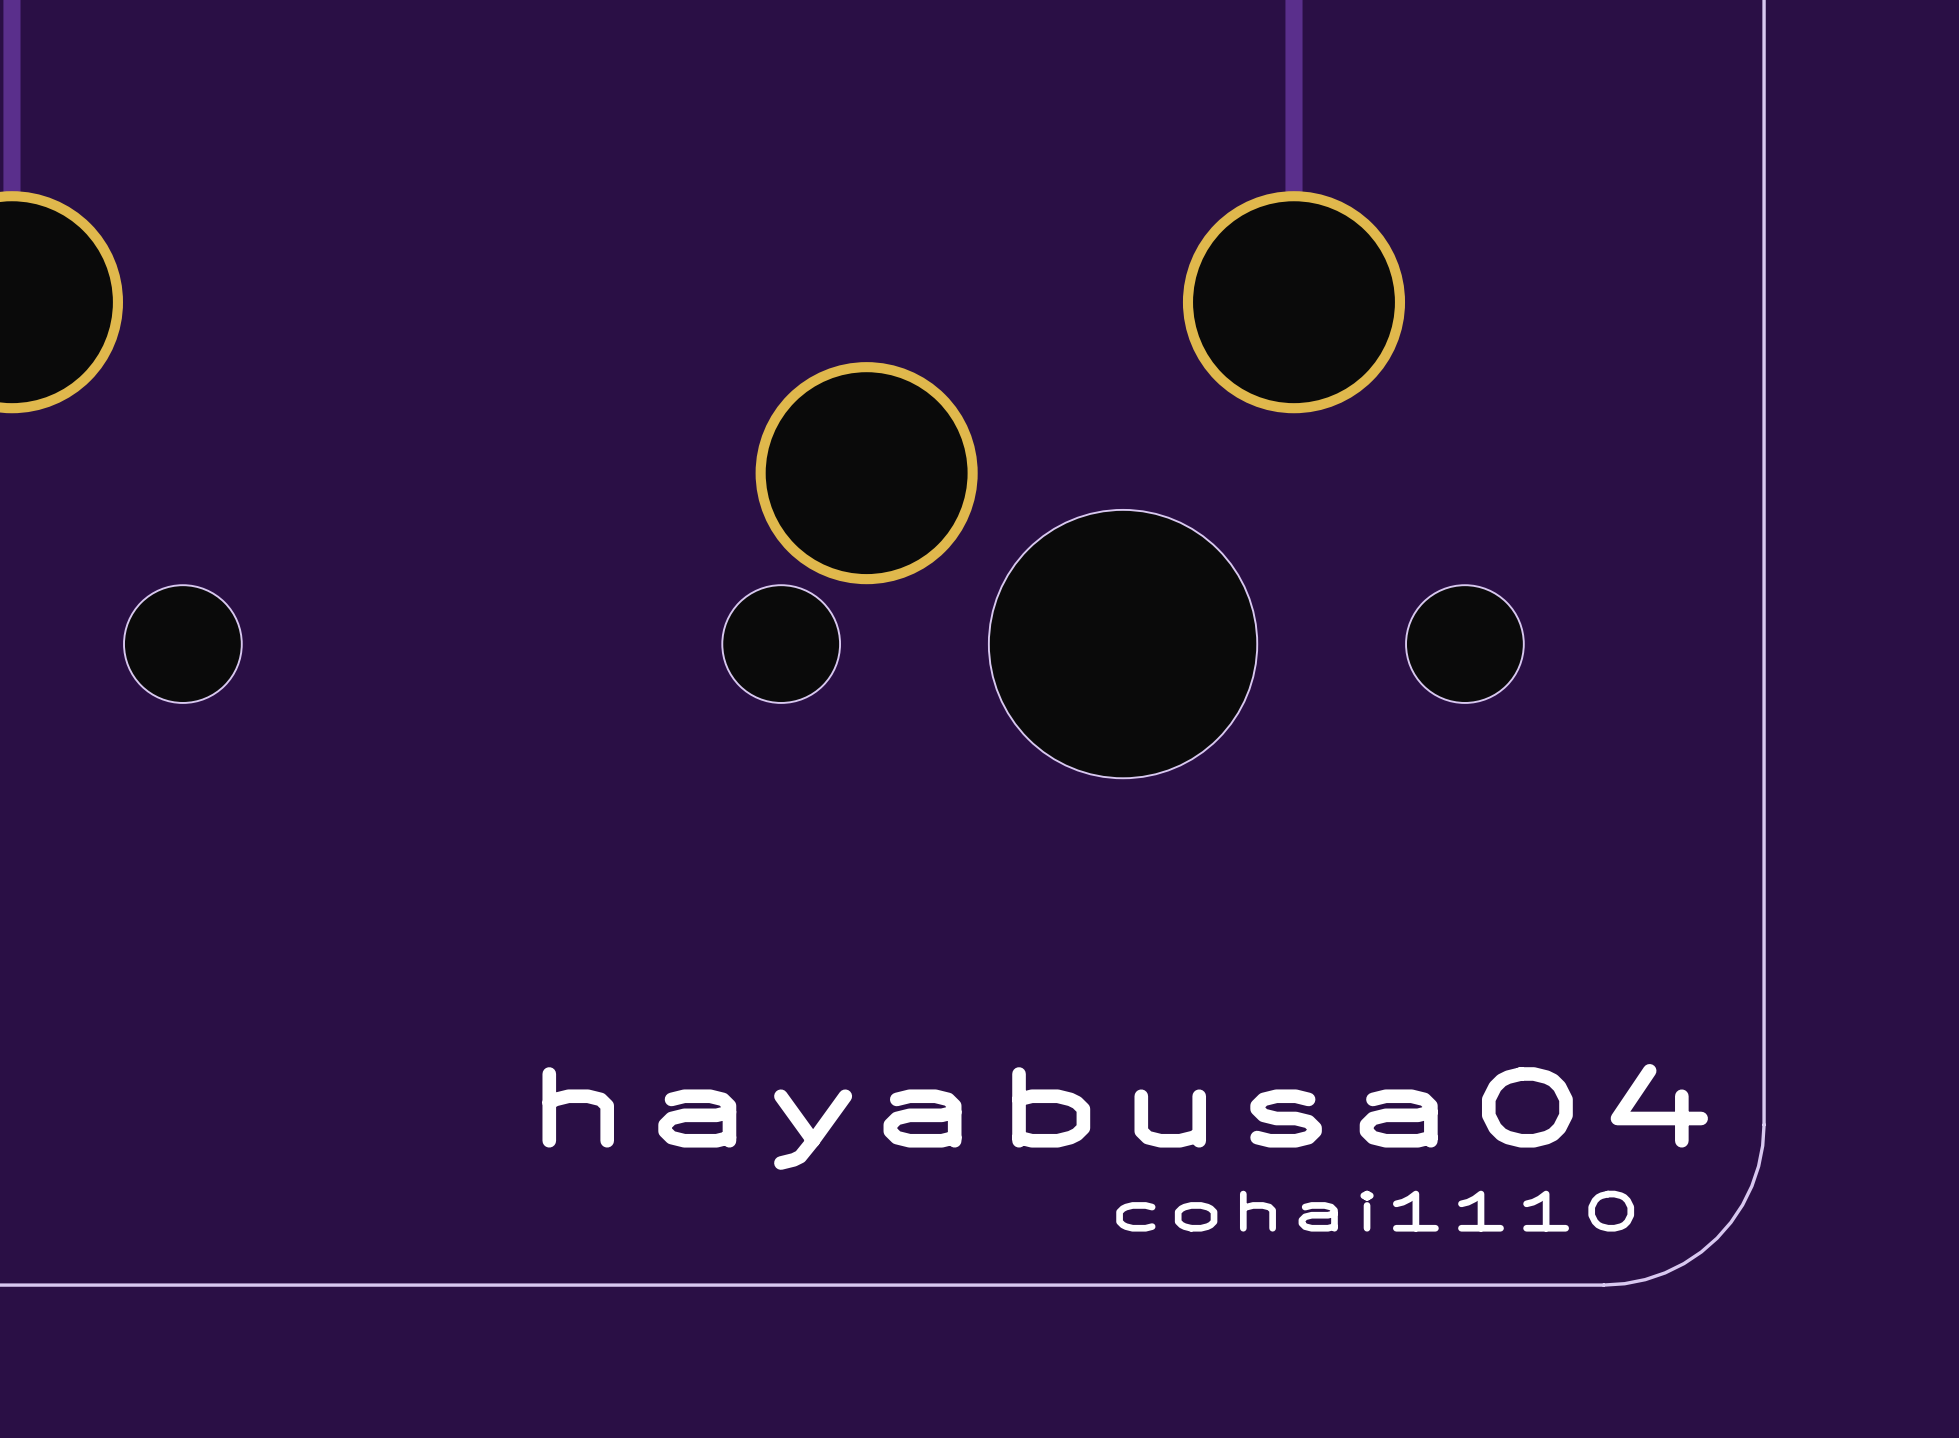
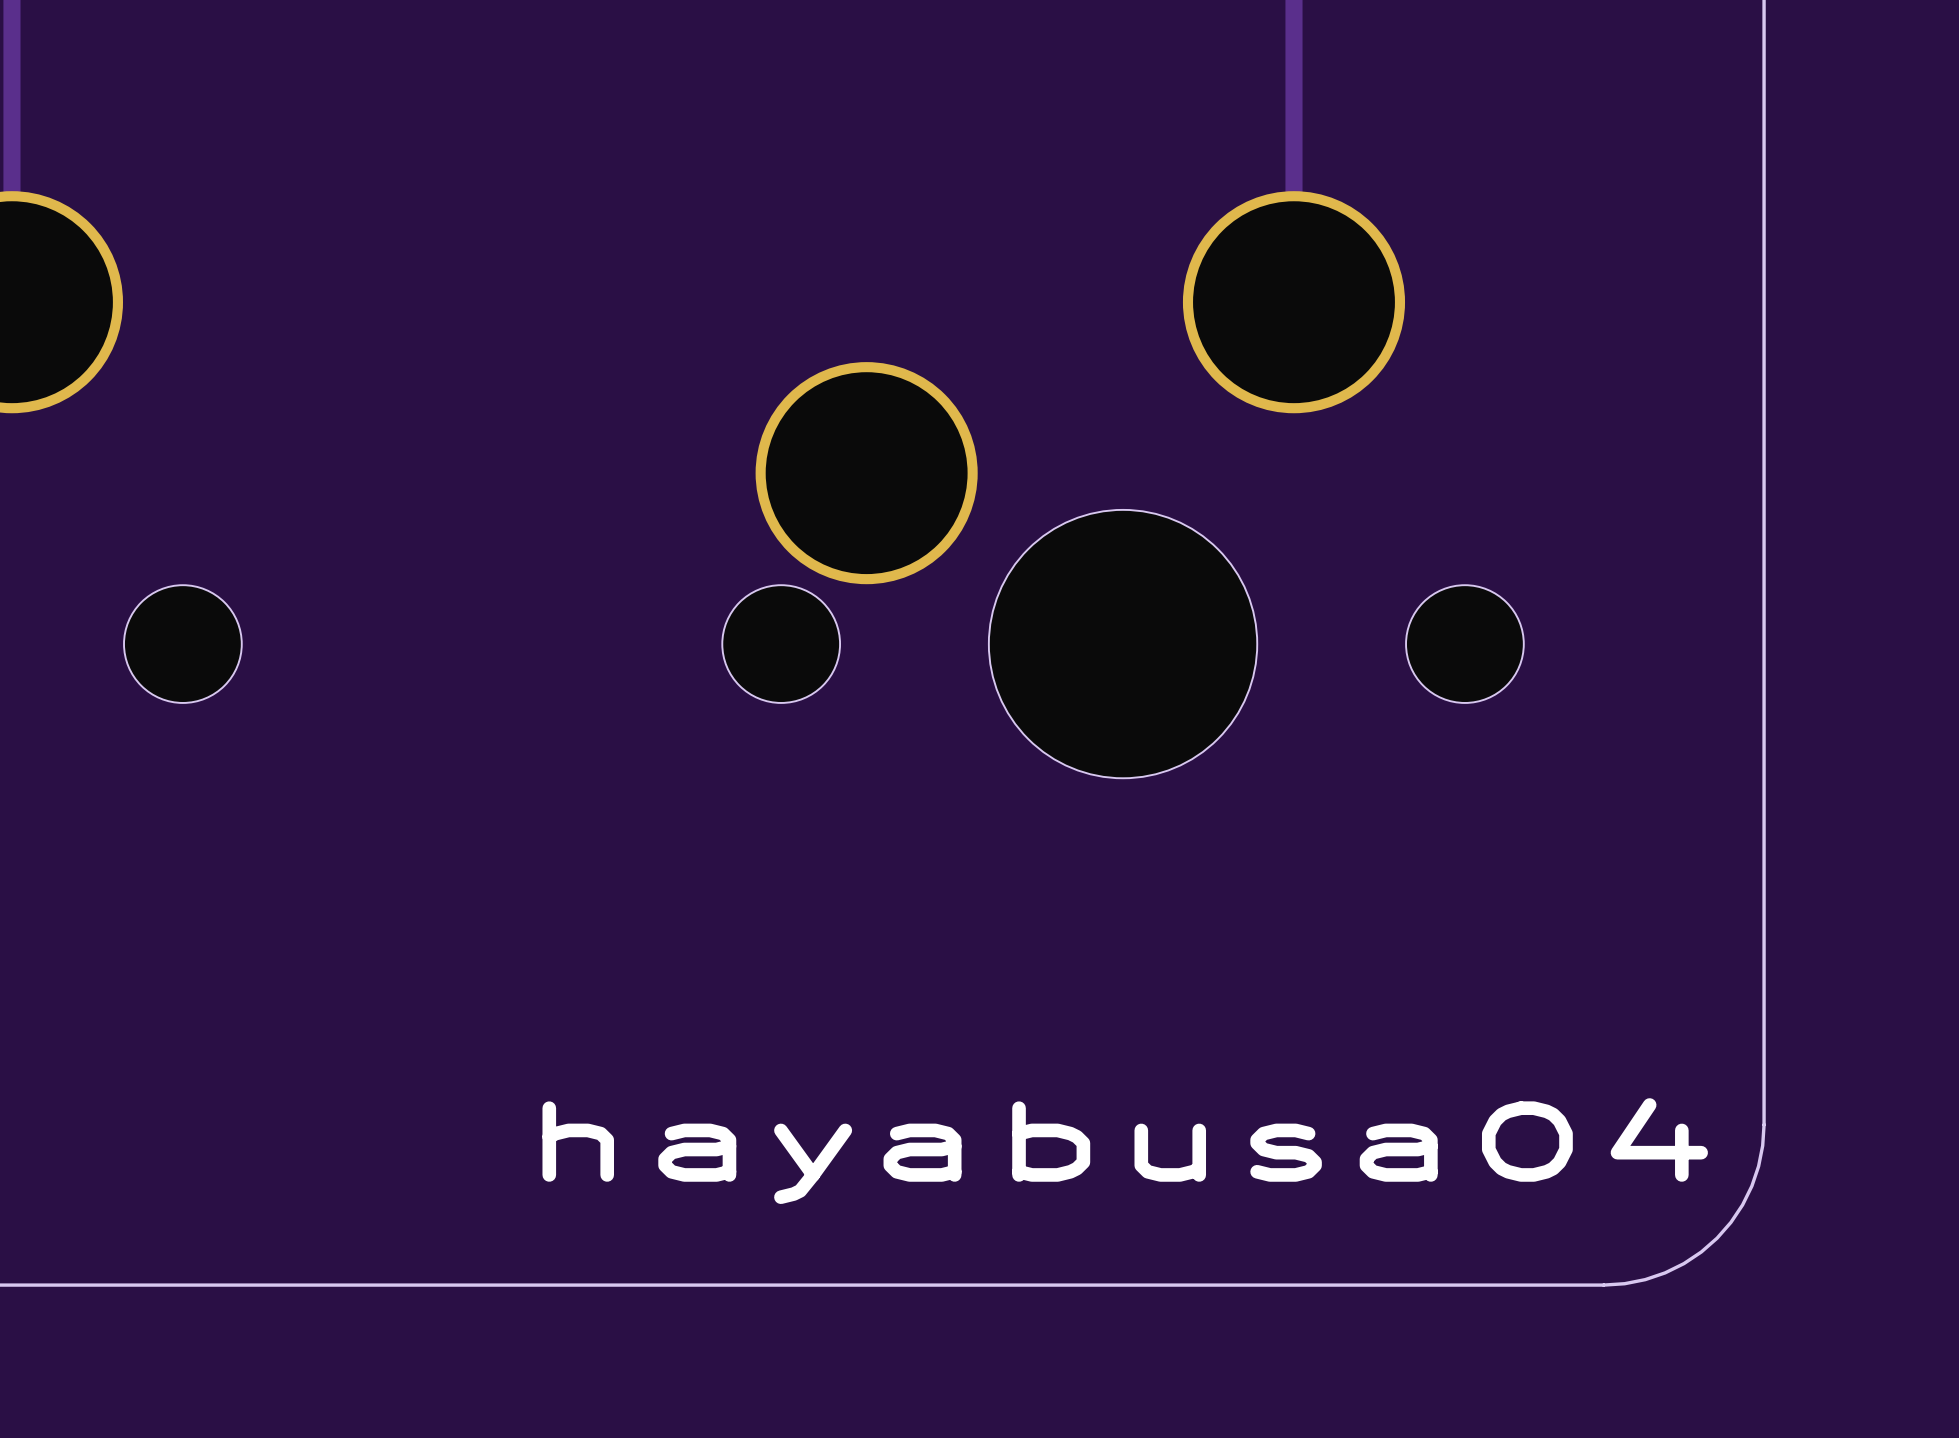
text position: hayabusa04 (1125, 1116) -> hayabusa04 (1125, 1151)
text: cohai1110 (1375, 1211) -> none

